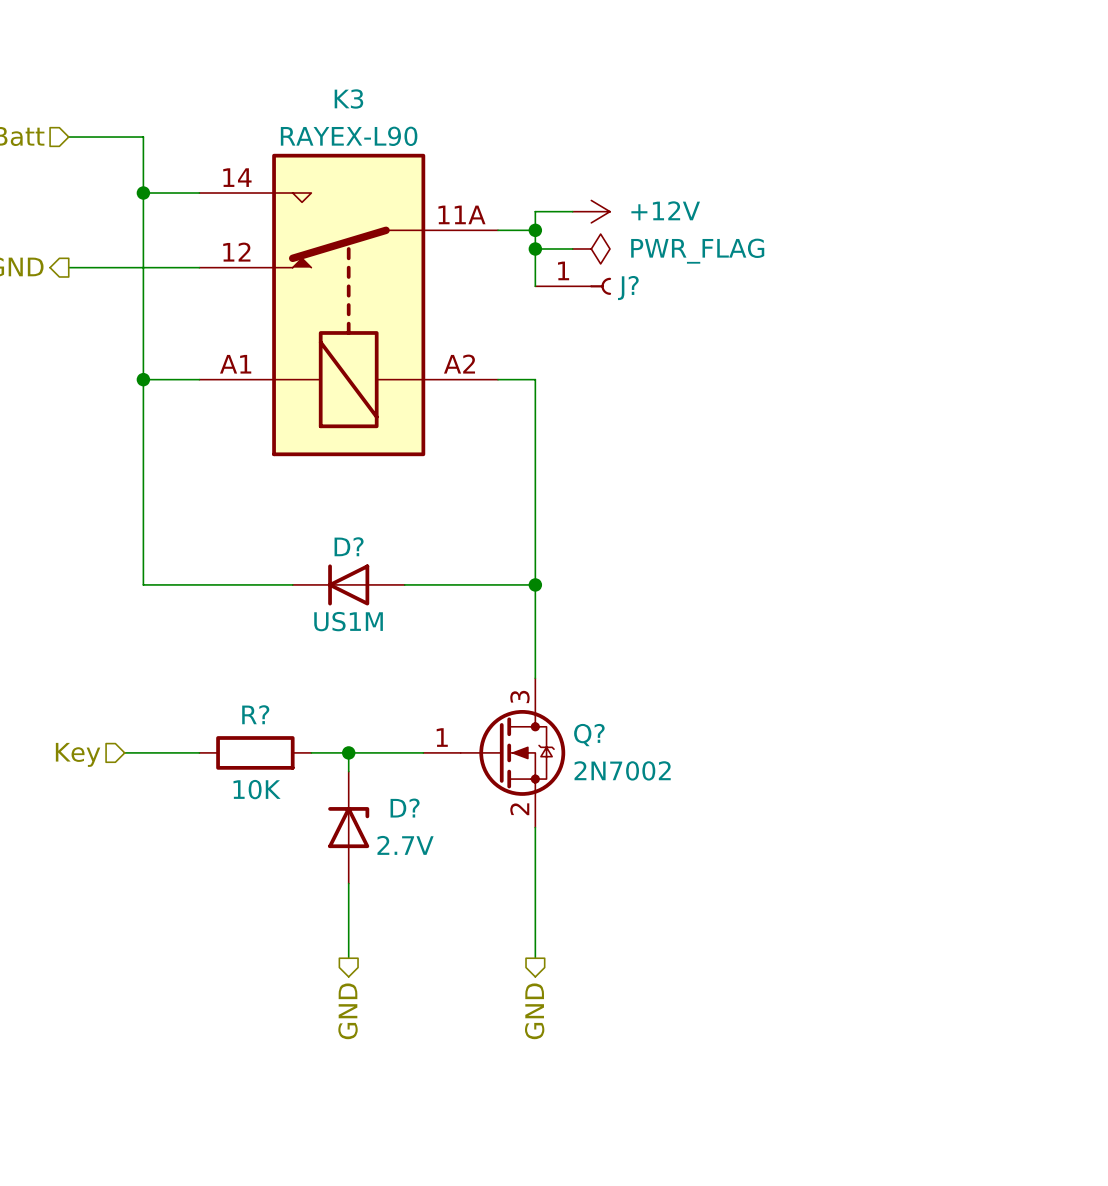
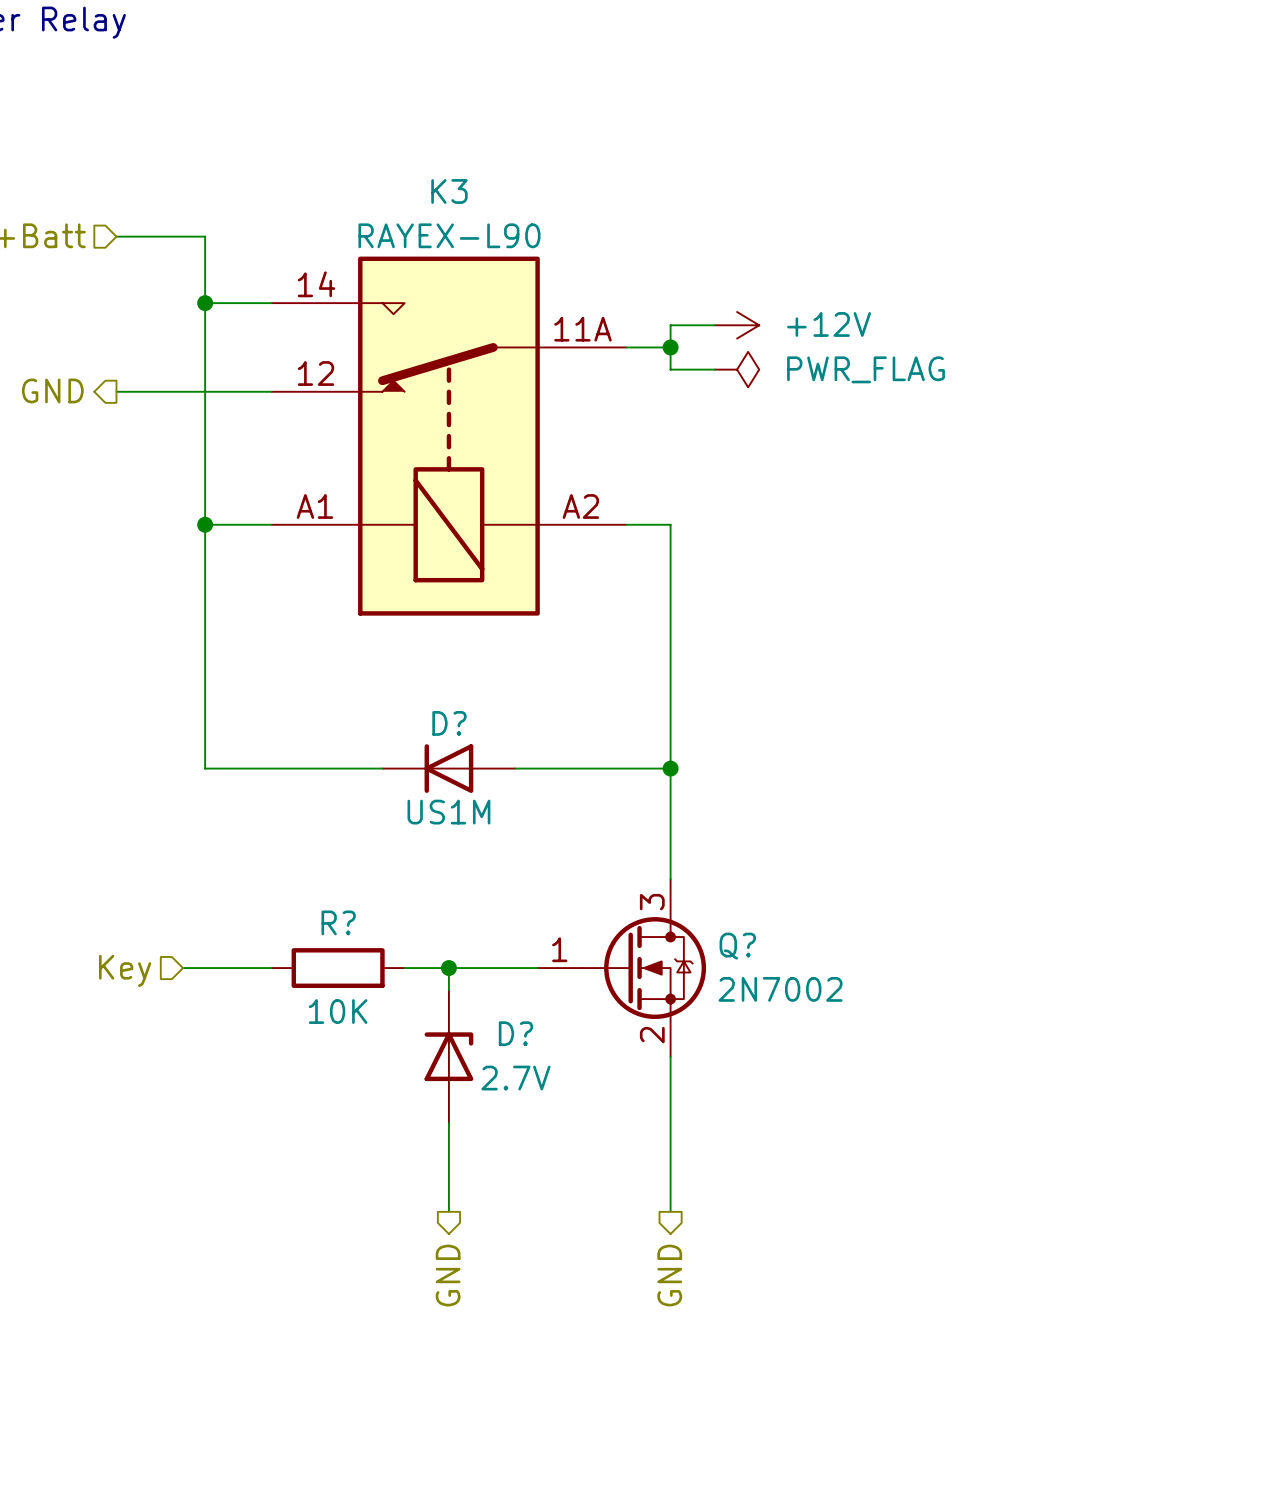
wire: (535, 248) (535, 286) -> none
junction: (535, 248) -> none
J?: (573, 286) -> none

